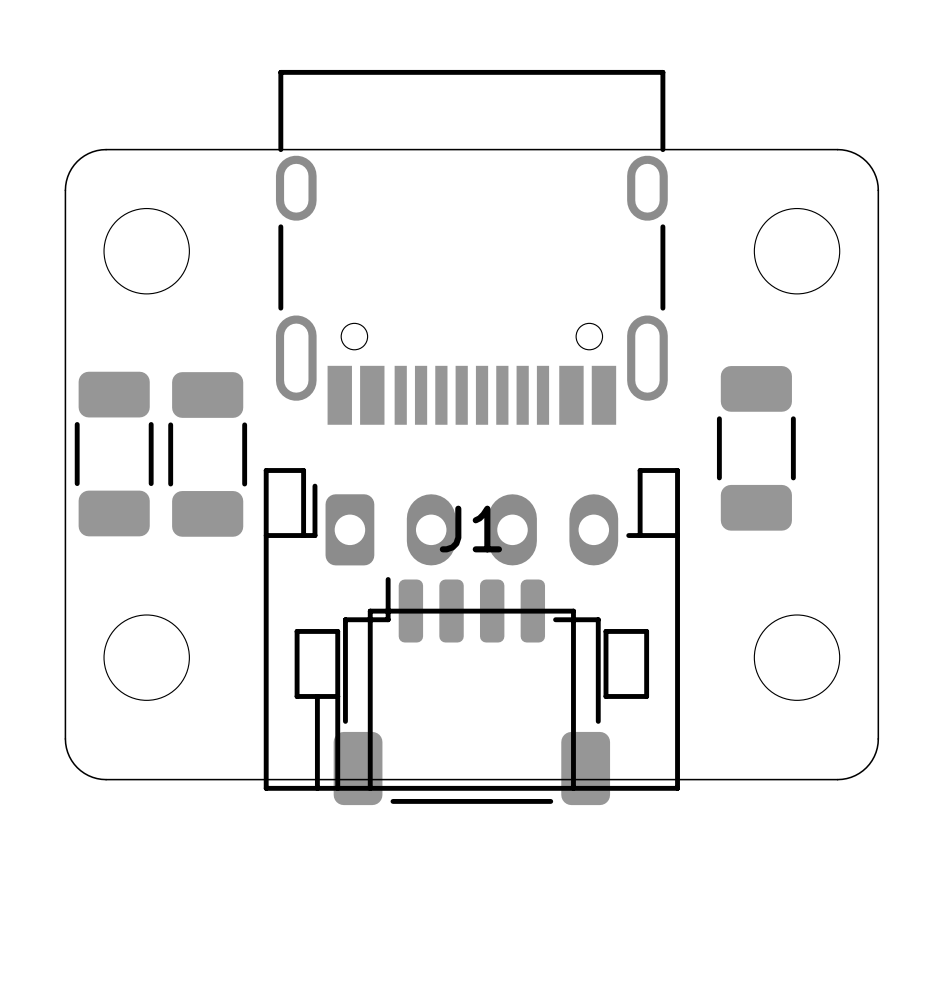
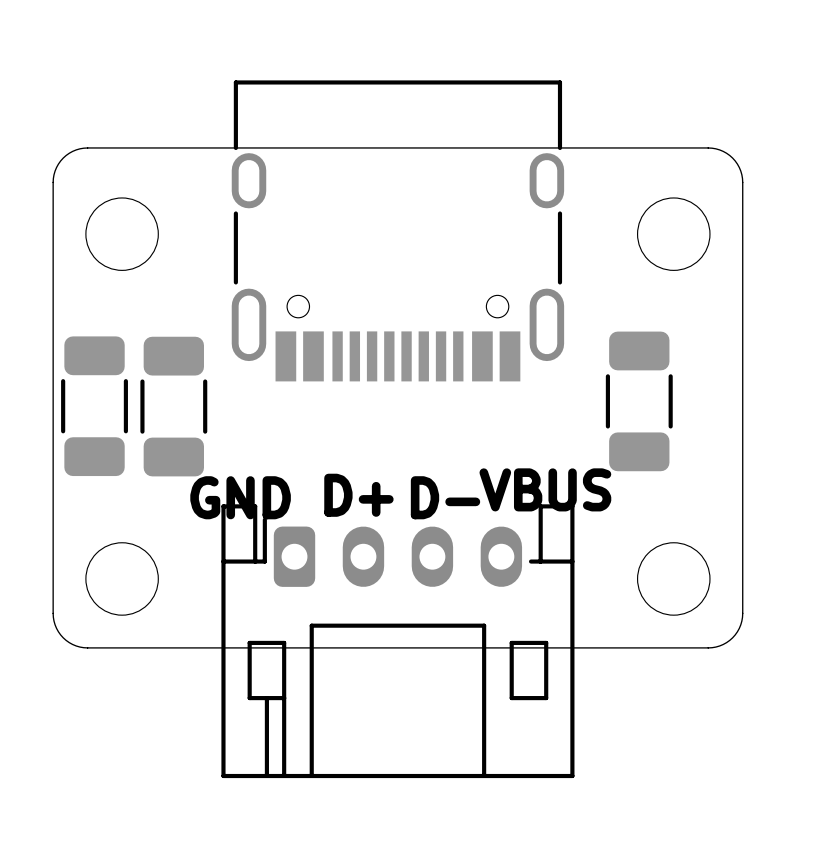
text: none -> VBUS (545, 489)
text: none -> D+ (358, 495)
text: none -> GND (240, 497)
text: none -> D- (445, 497)
part position: (471, 629) -> (397, 641)
J1: (471, 691) -> none
board edge: (65, 698) (65, 743) (69, 756) (74, 764) (84, 773) (92, 777) (106, 779) (842, 779) (855, 775) (863, 770) (874, 756) (878, 743) (878, 698) -> (53, 613) (56, 628) (63, 637) (72, 644) (87, 647) (708, 647) (723, 644) (732, 637) (740, 624) (742, 613)

